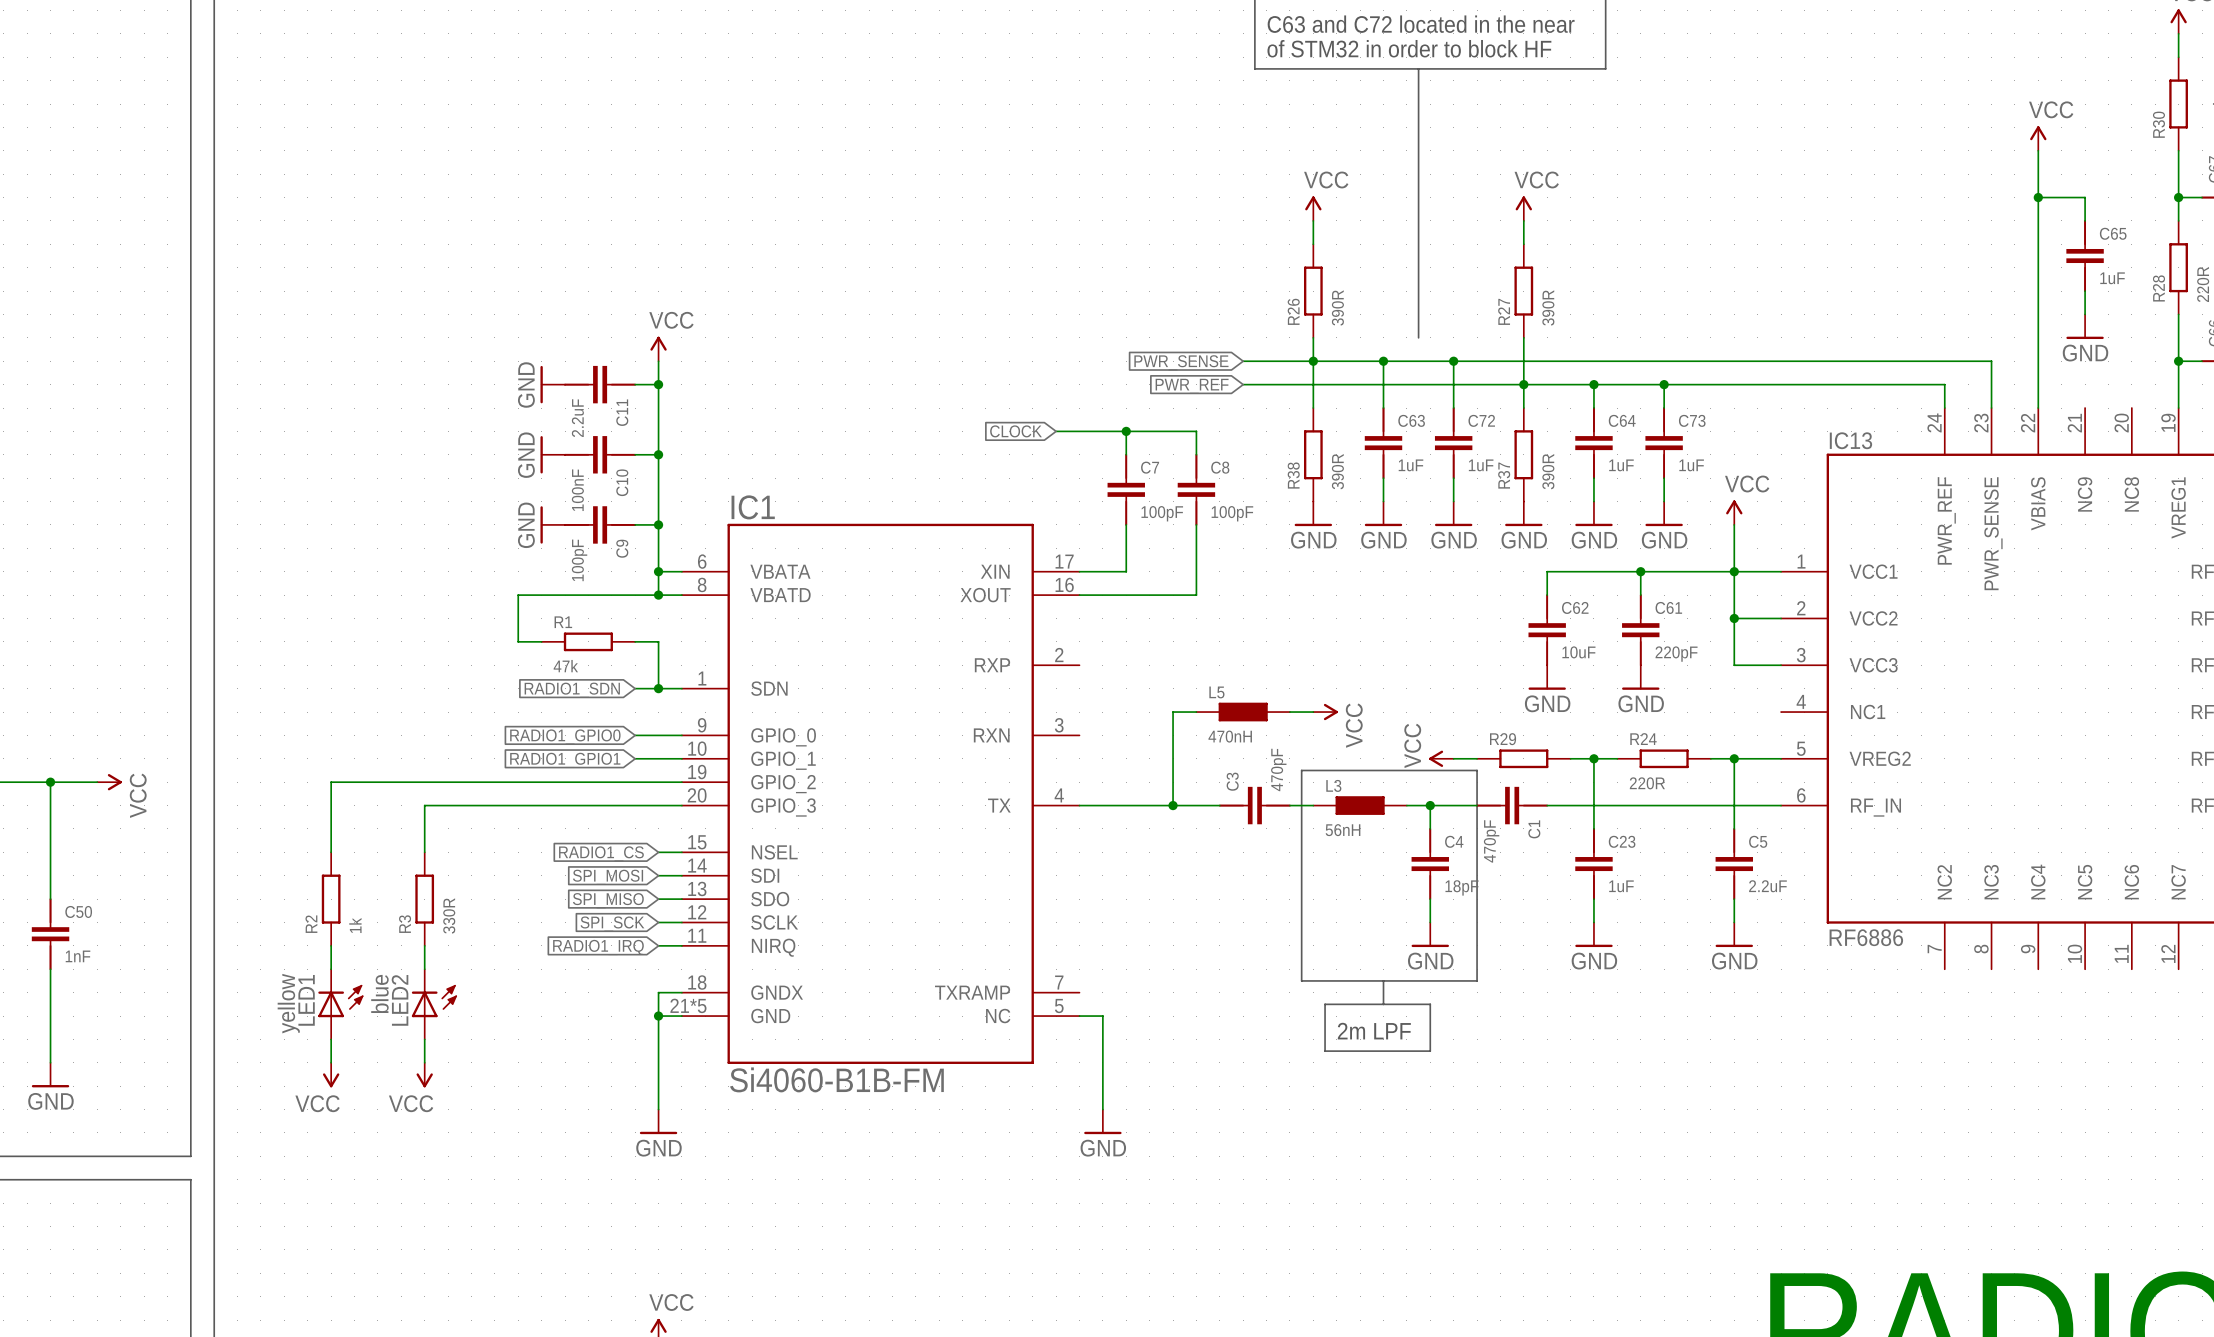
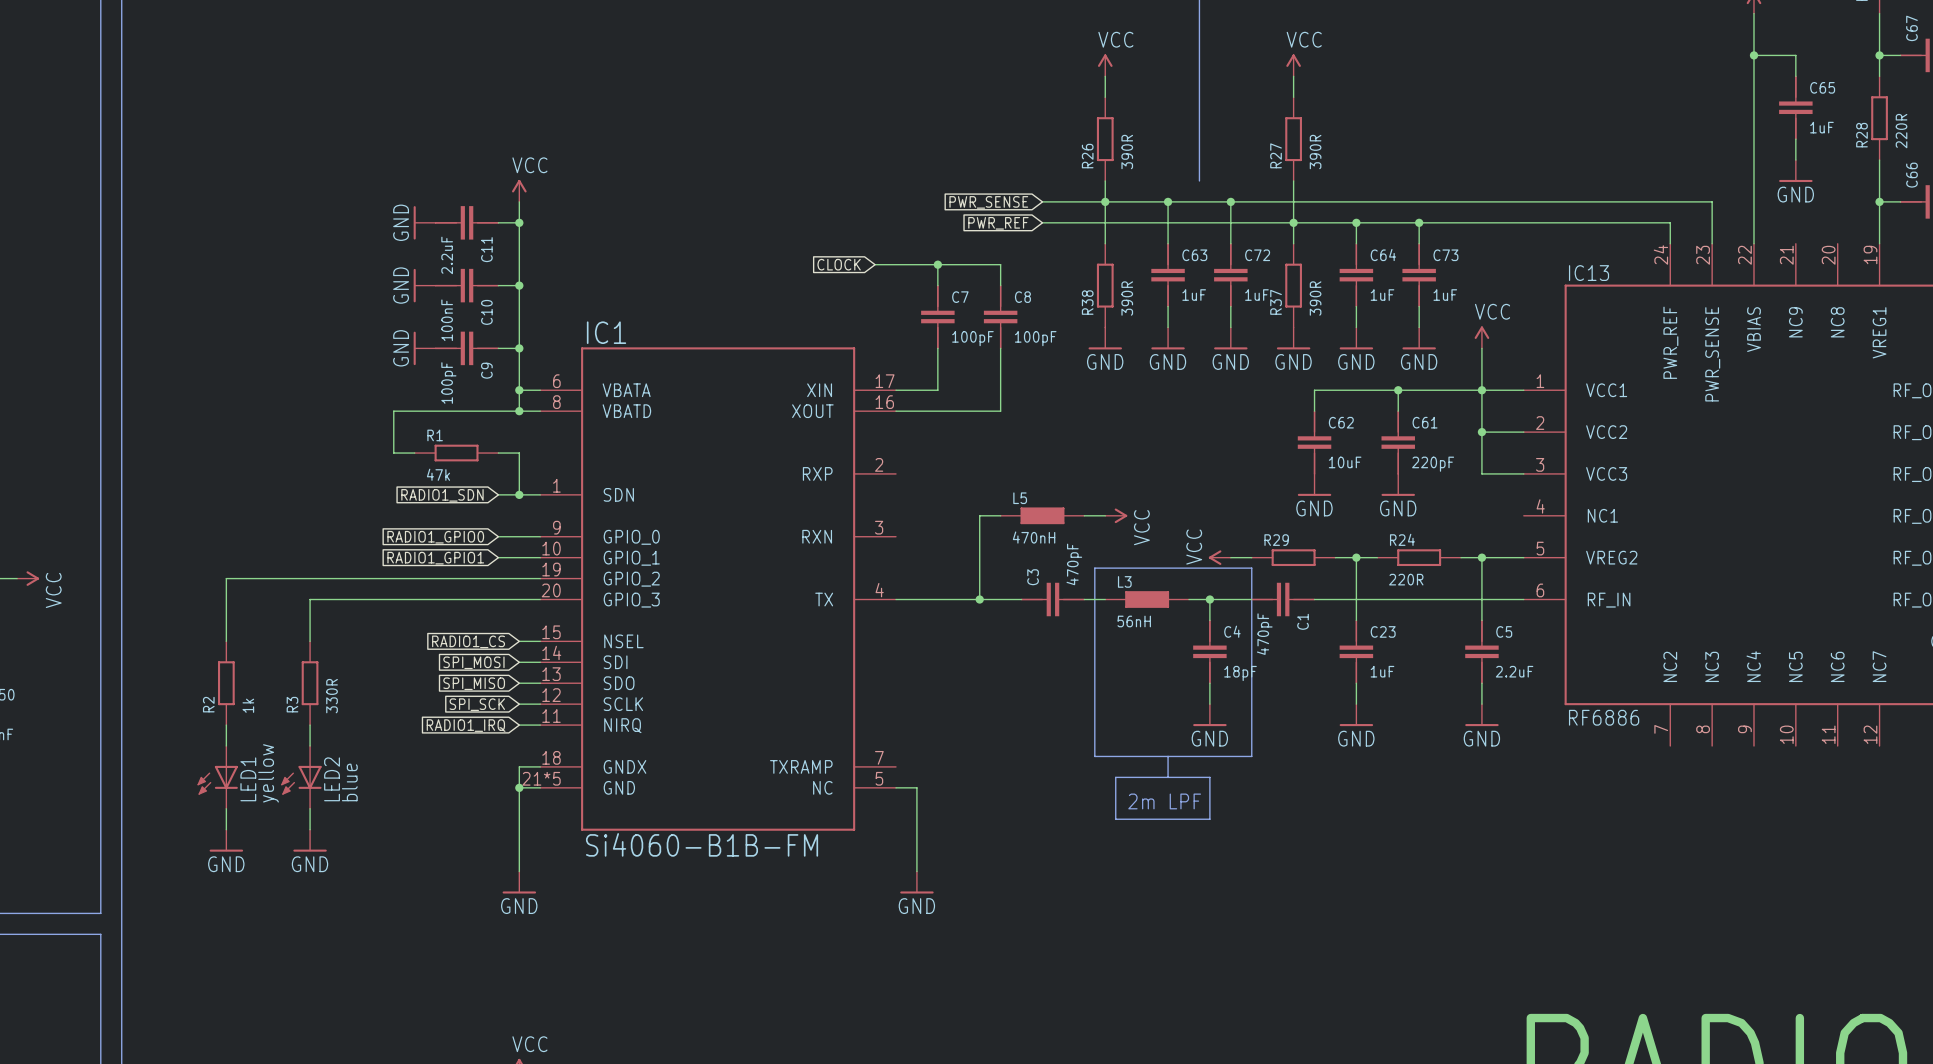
LED1 rotation: 0° (340, 1001) -> 180° (217, 780)
LED2 rotation: 0° (434, 1001) -> 180° (301, 780)
power symbol: VCC (331, 1075) -> GND (226, 840)
power symbol: VCC (424, 1075) -> GND (310, 840)

